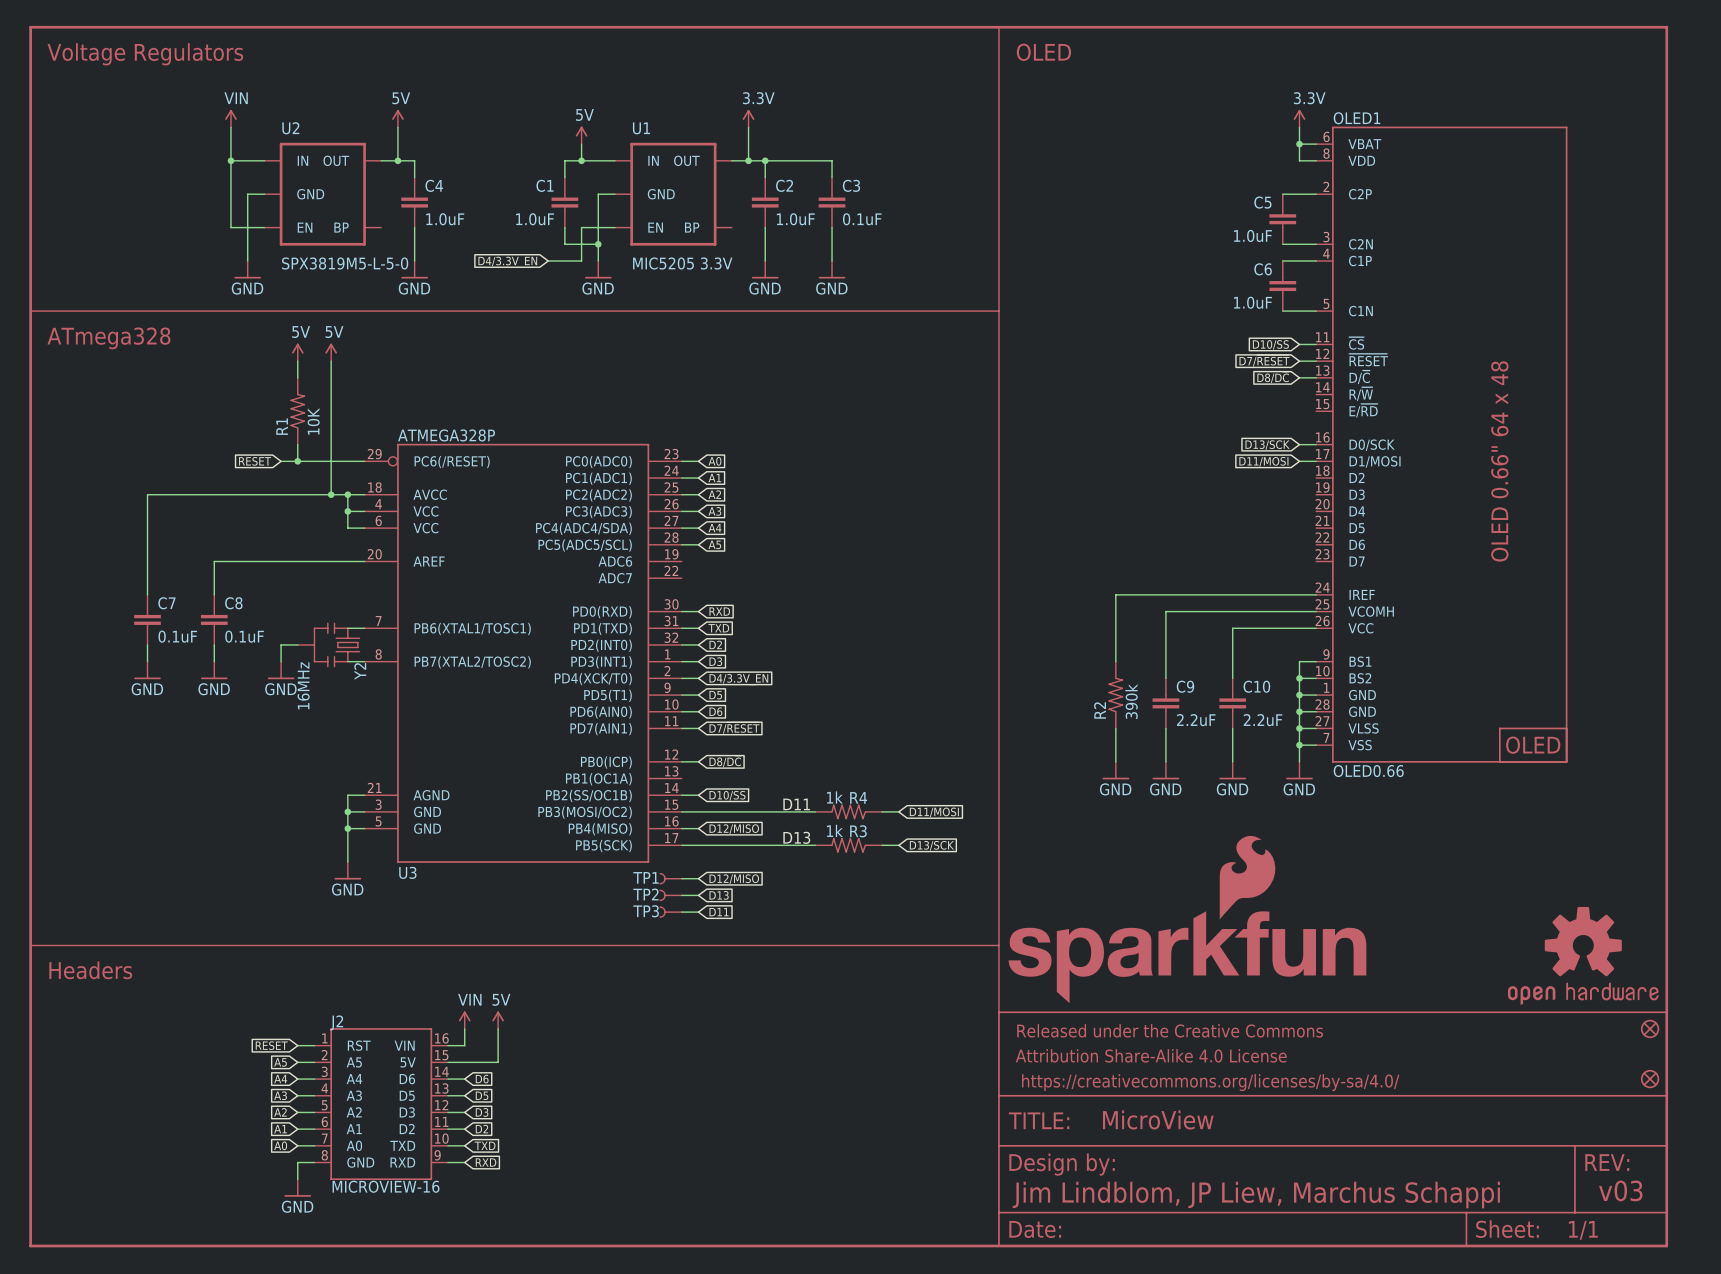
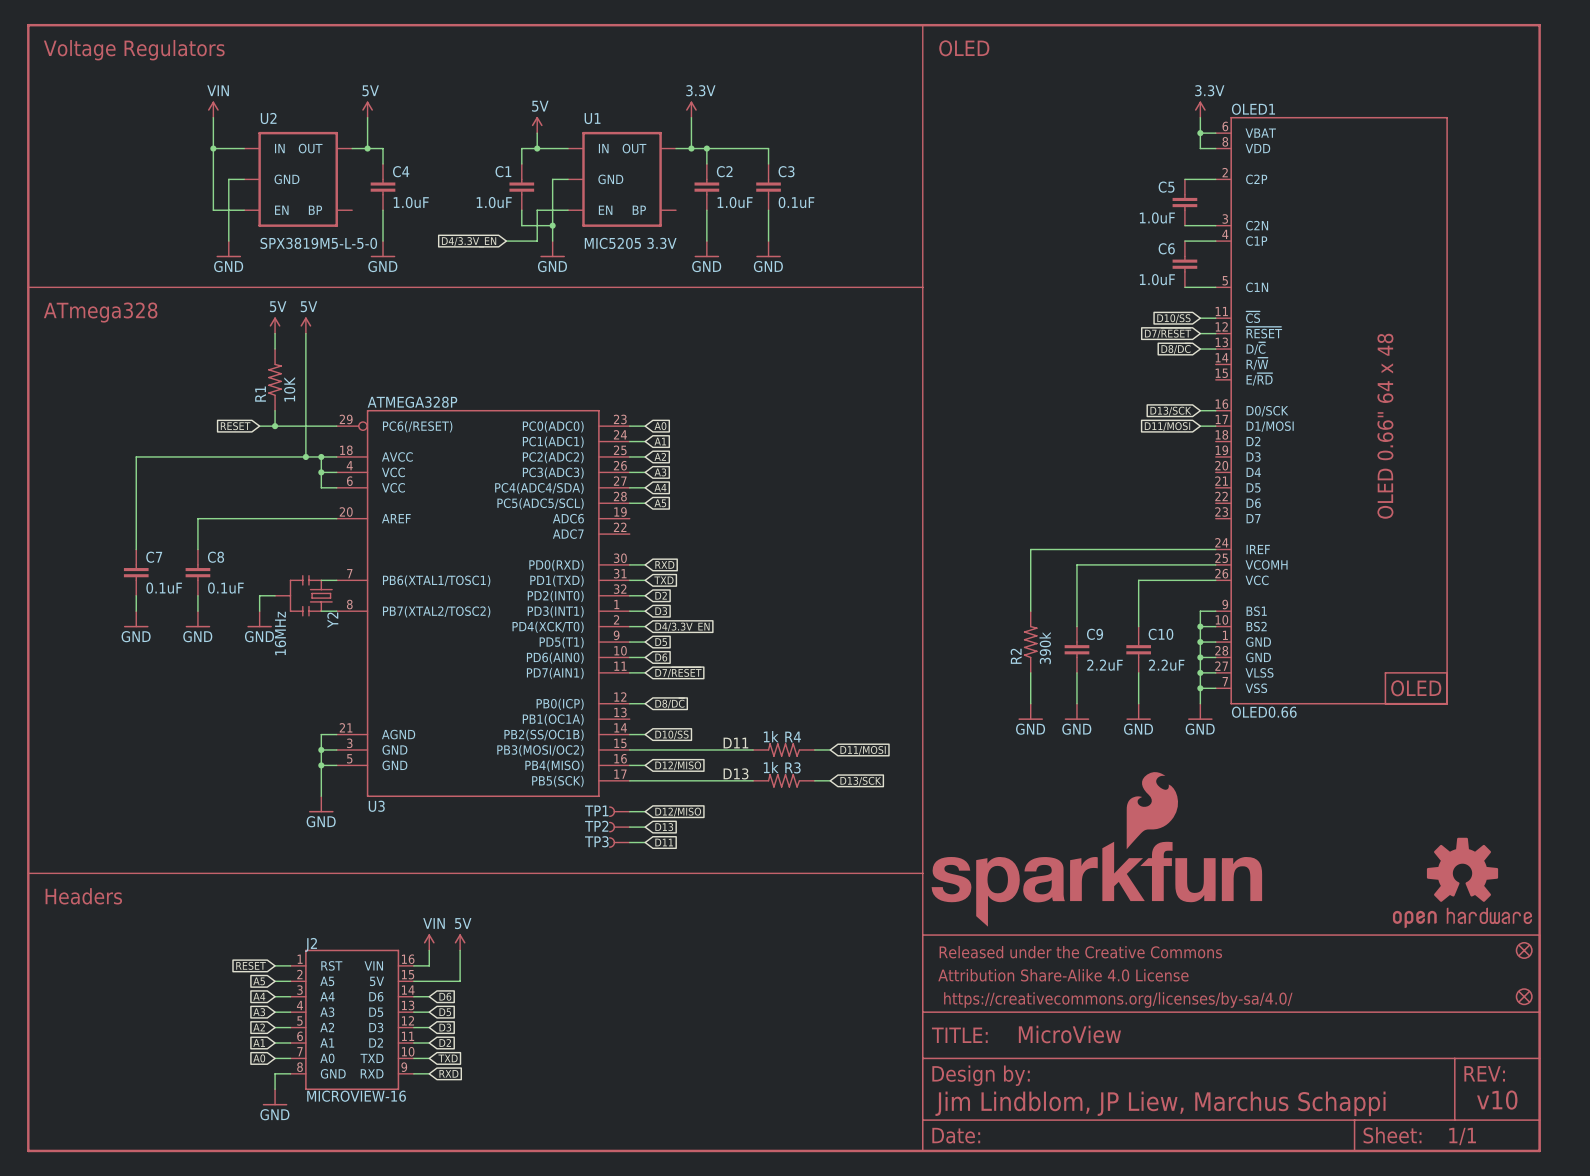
text: v03 (1620, 1190) -> v10 (1497, 1100)

